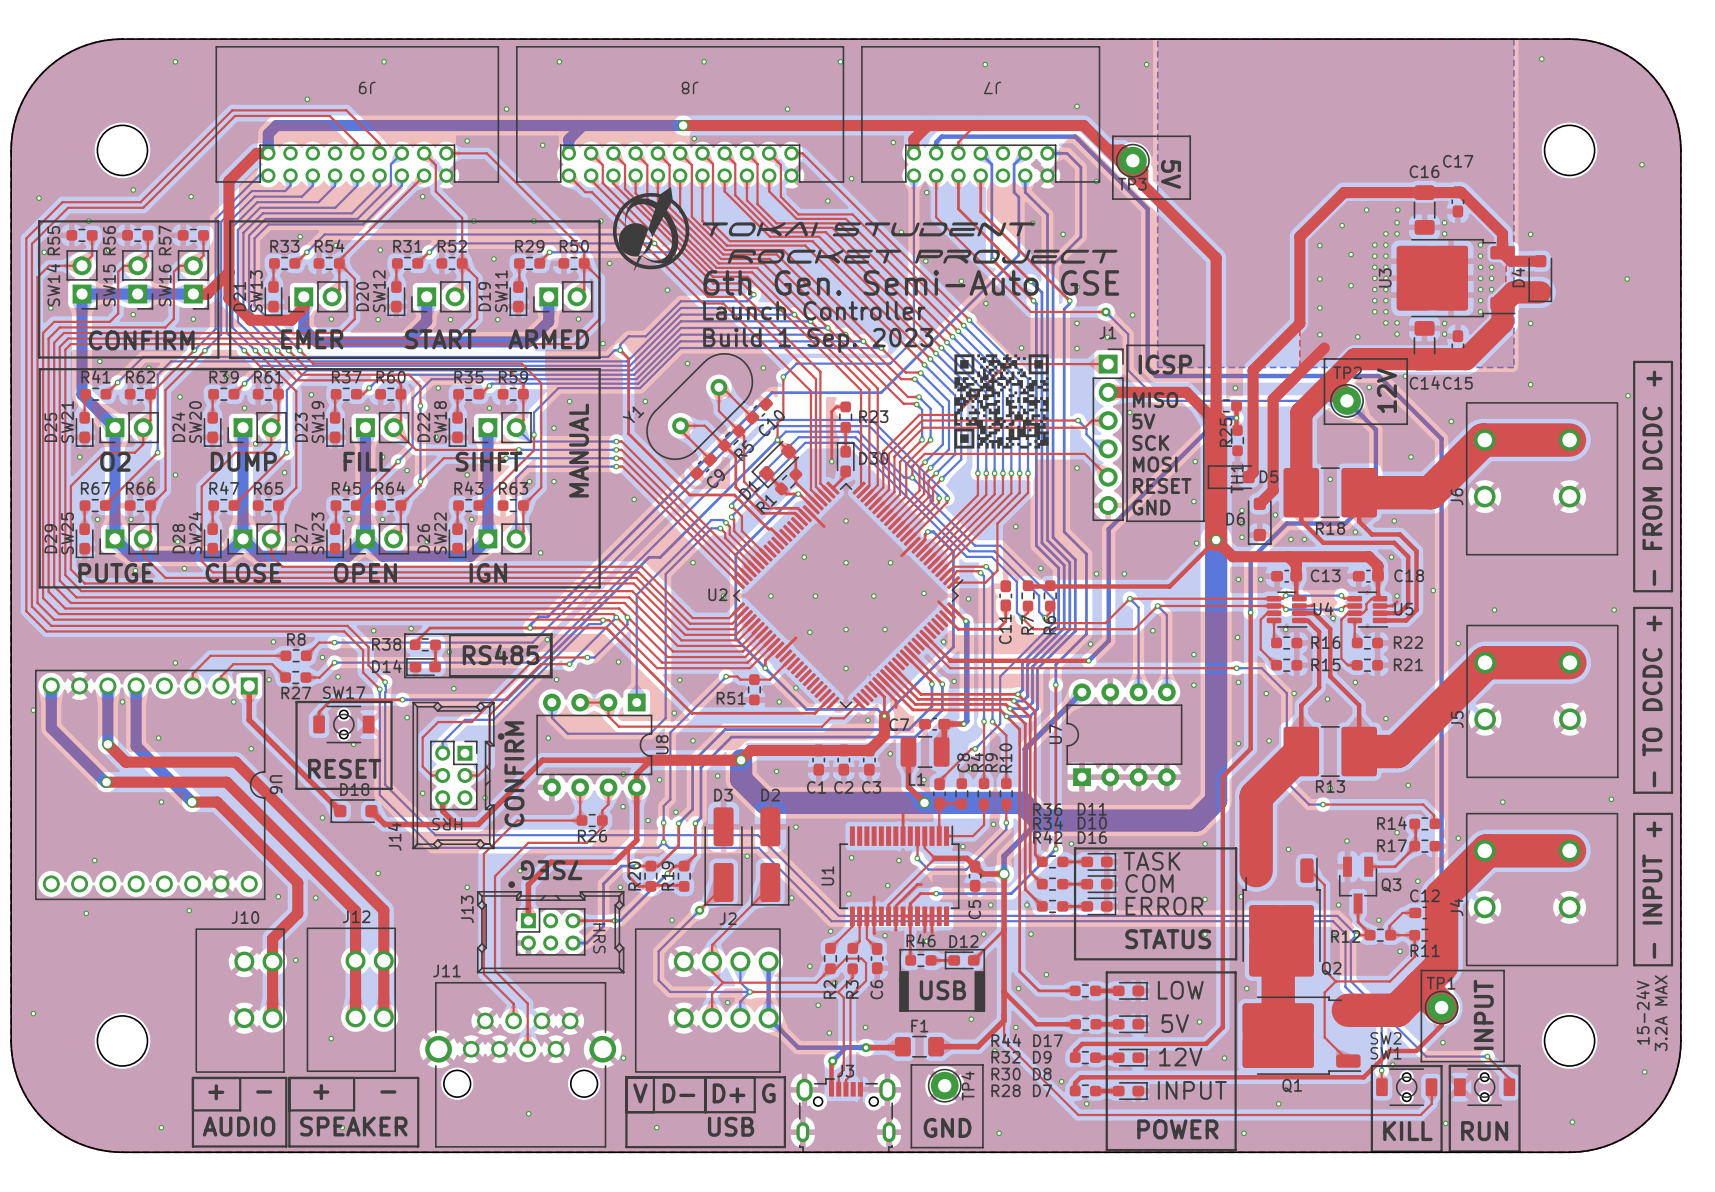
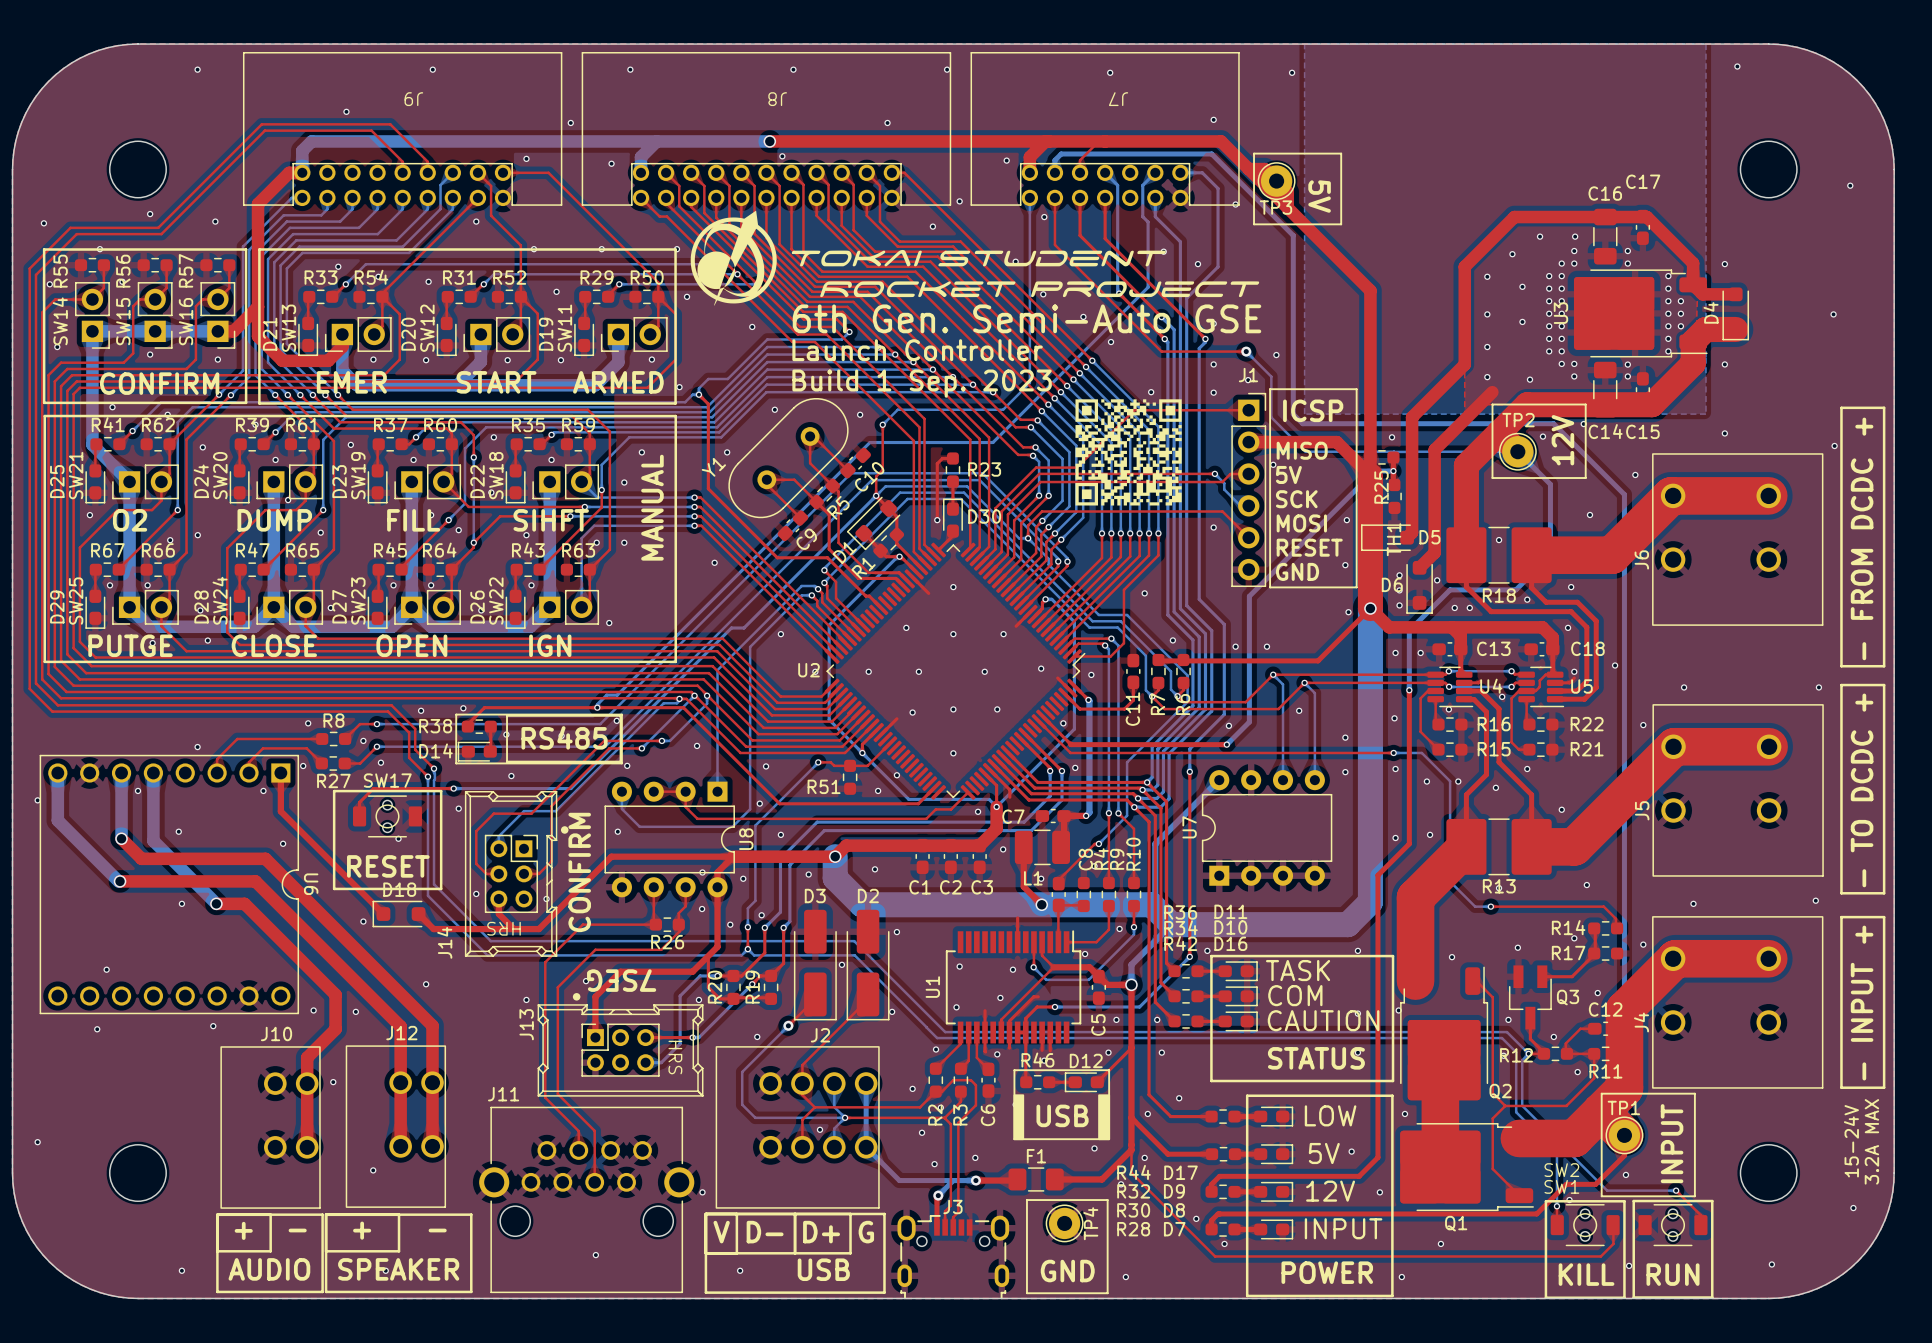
text: ERROR (1164, 906) -> CAUTION (1323, 1020)

